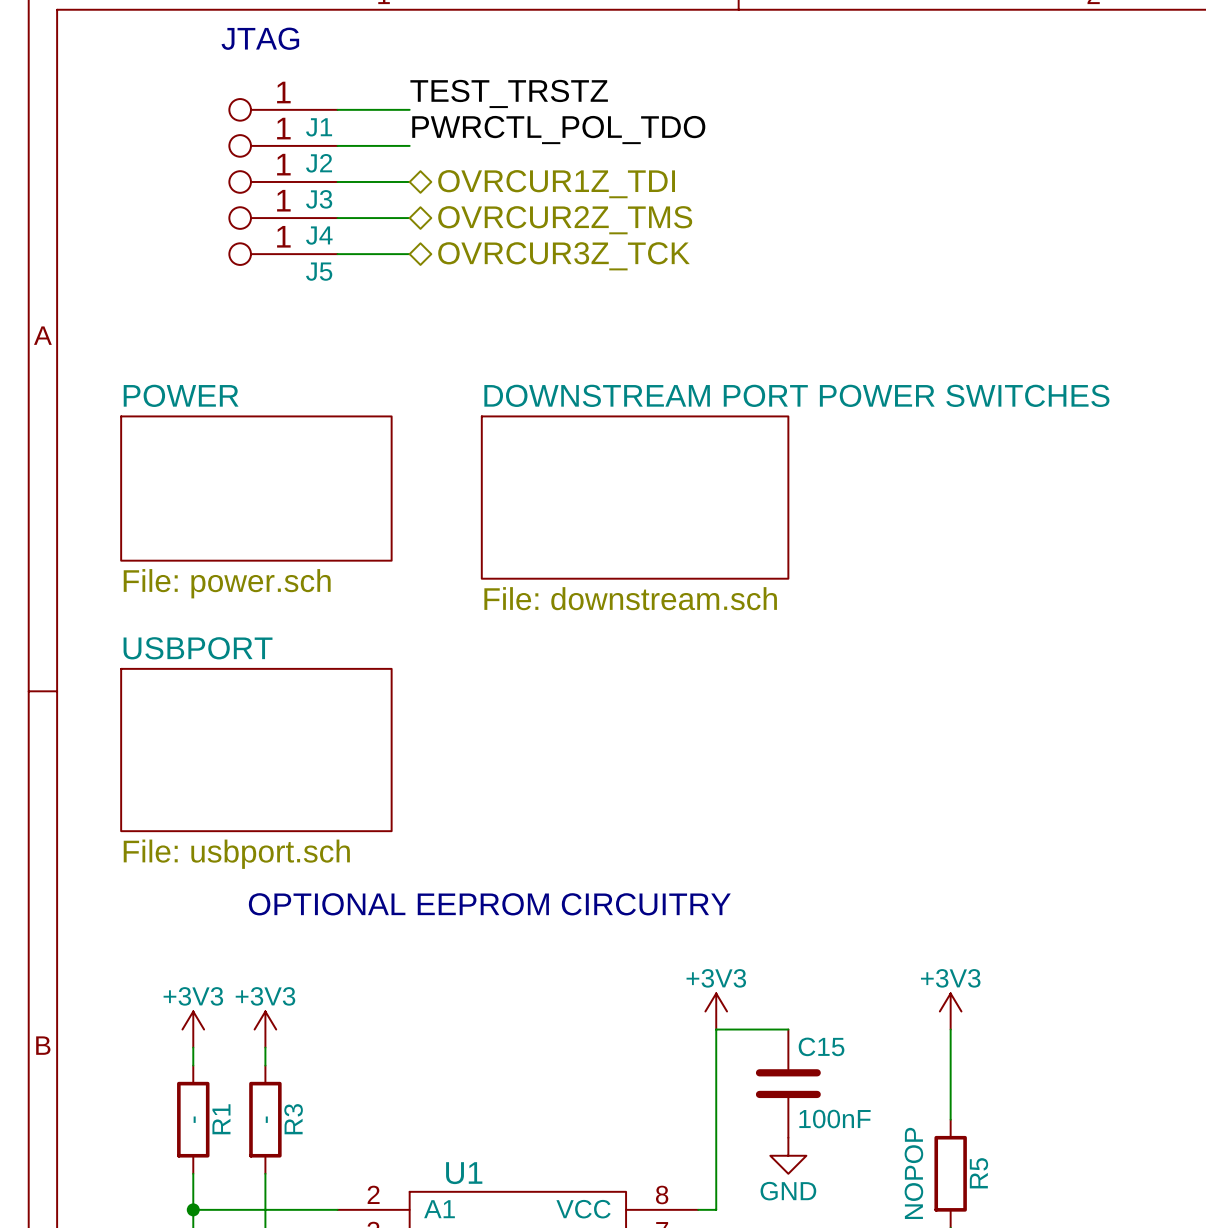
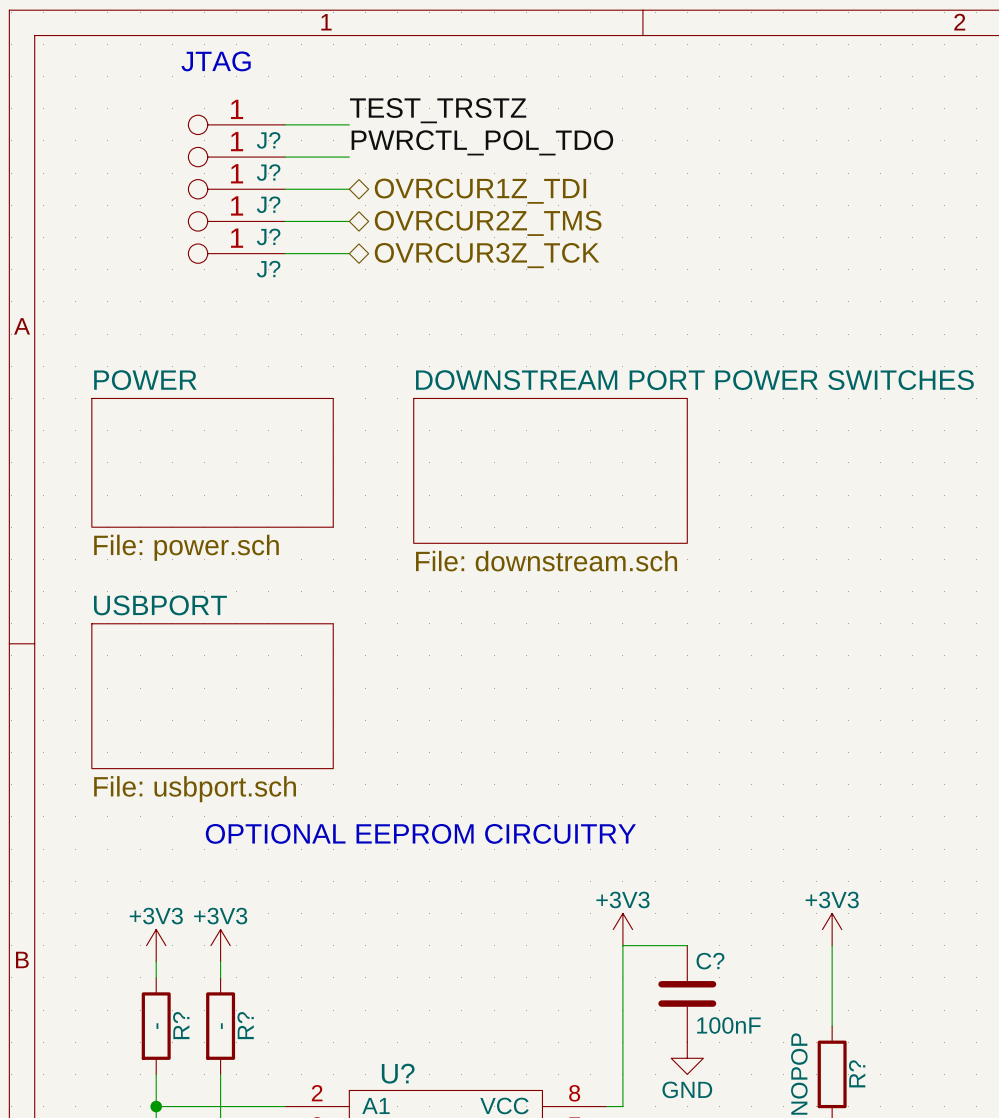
J1 name: J1 (319, 127) -> J? (268, 140)
J2 name: J2 (319, 163) -> J? (268, 172)
J3 name: J3 (319, 199) -> J? (268, 204)
J4 name: J4 (319, 235) -> J? (268, 236)
J5 name: J5 (319, 271) -> J? (268, 269)
C15 name: C15 (821, 1046) -> C? (710, 961)
R1 name: R1 (221, 1119) -> R? (181, 1025)
R3 name: R3 (293, 1119) -> R? (245, 1025)
U1 name: U1 (464, 1173) -> U? (398, 1073)
R5 name: R5 (978, 1173) -> R? (857, 1073)

